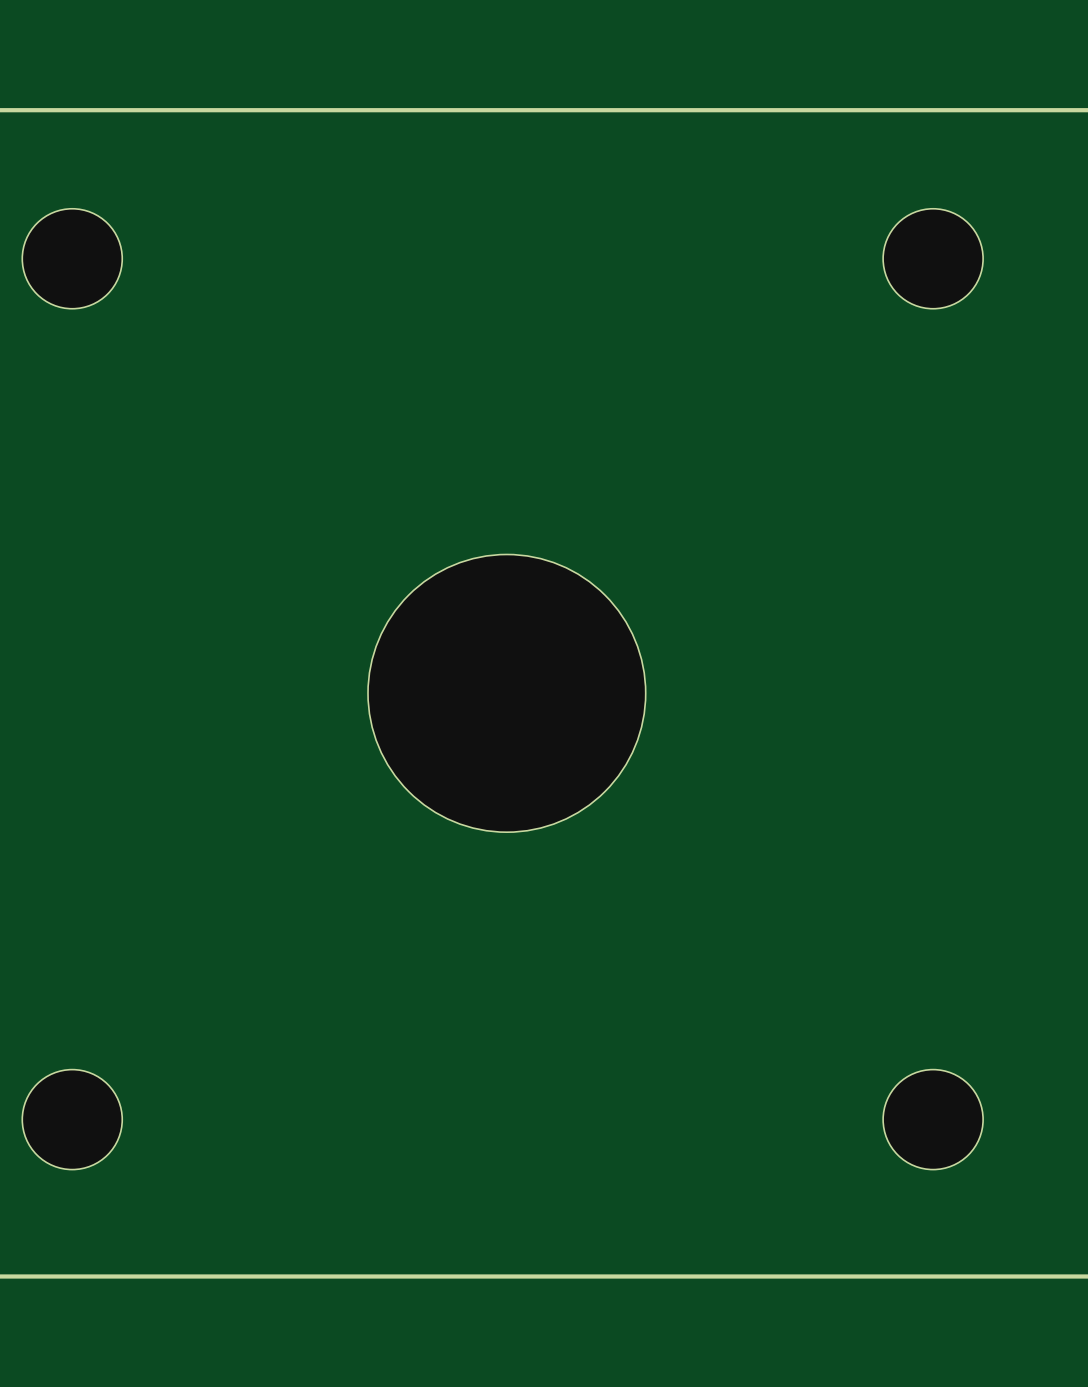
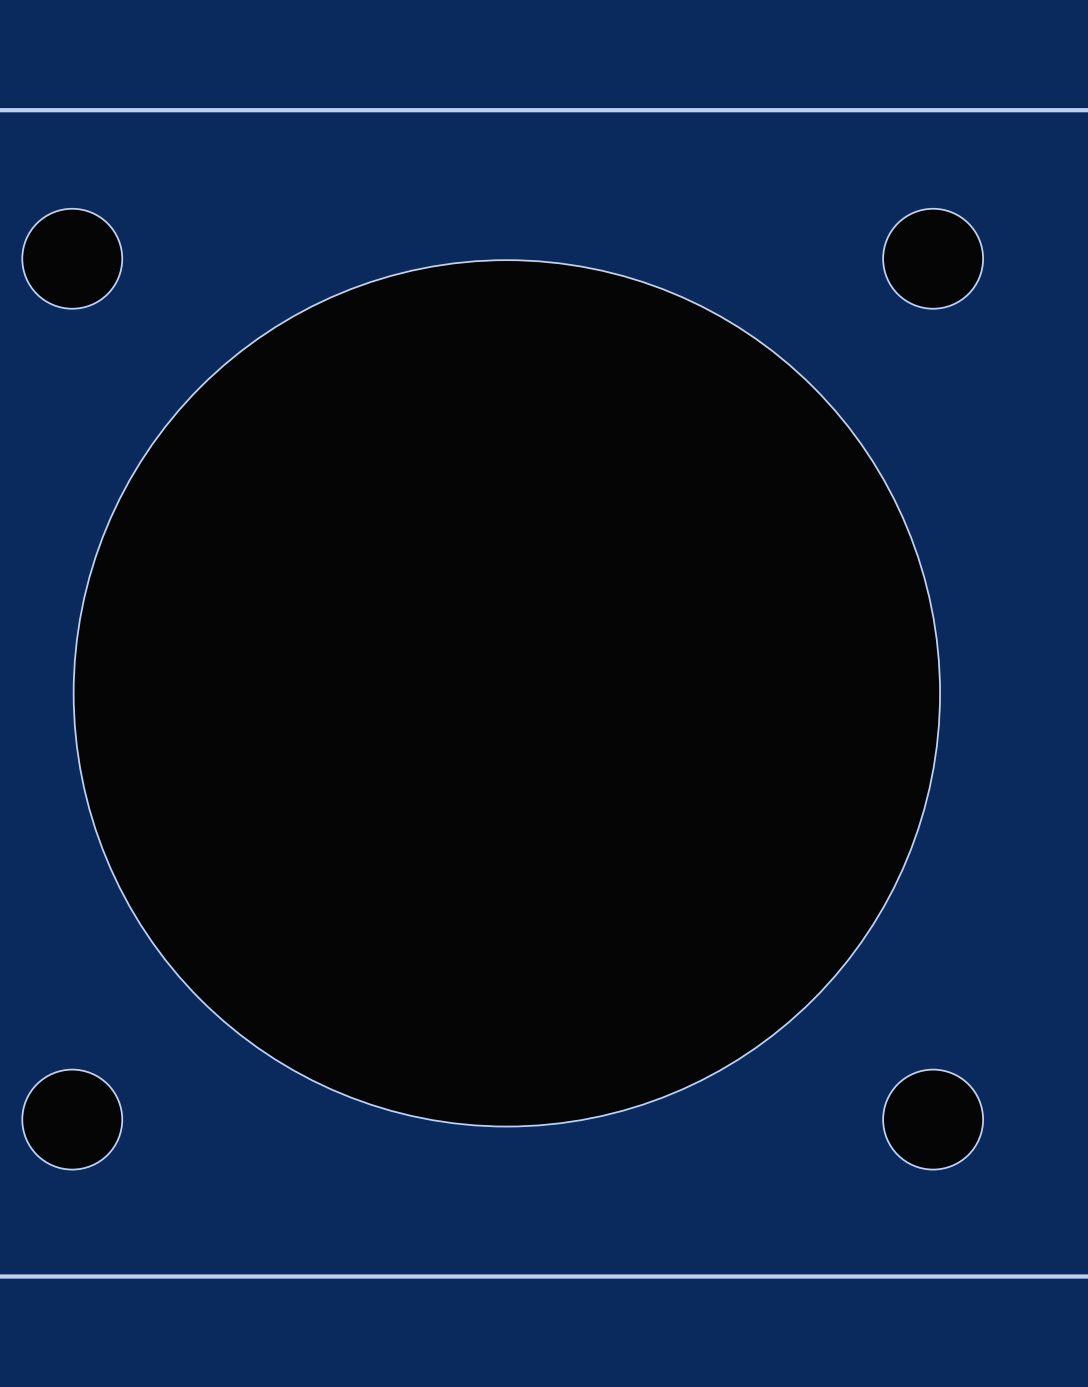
hole size: [368, 554, 646, 833] -> [73, 260, 941, 1127]

